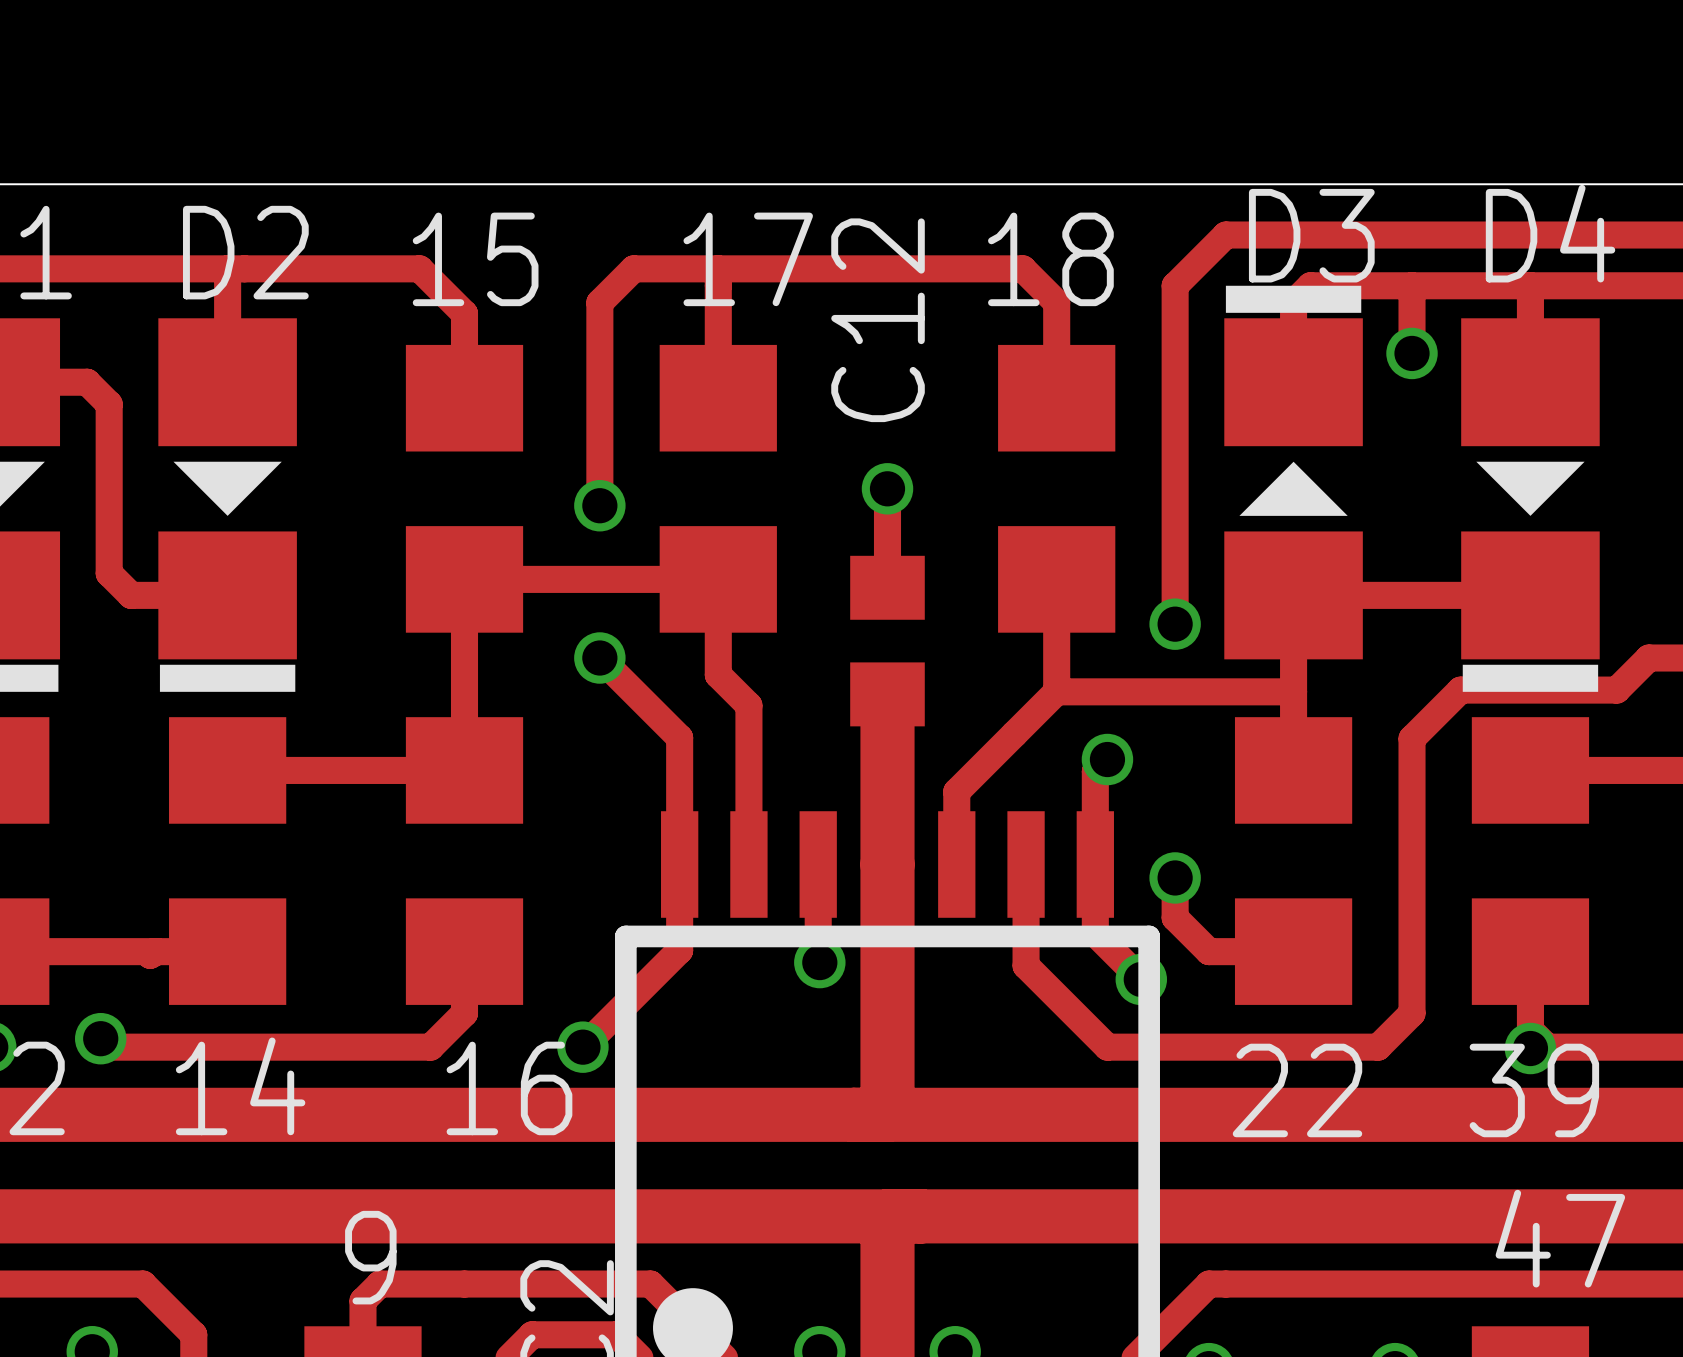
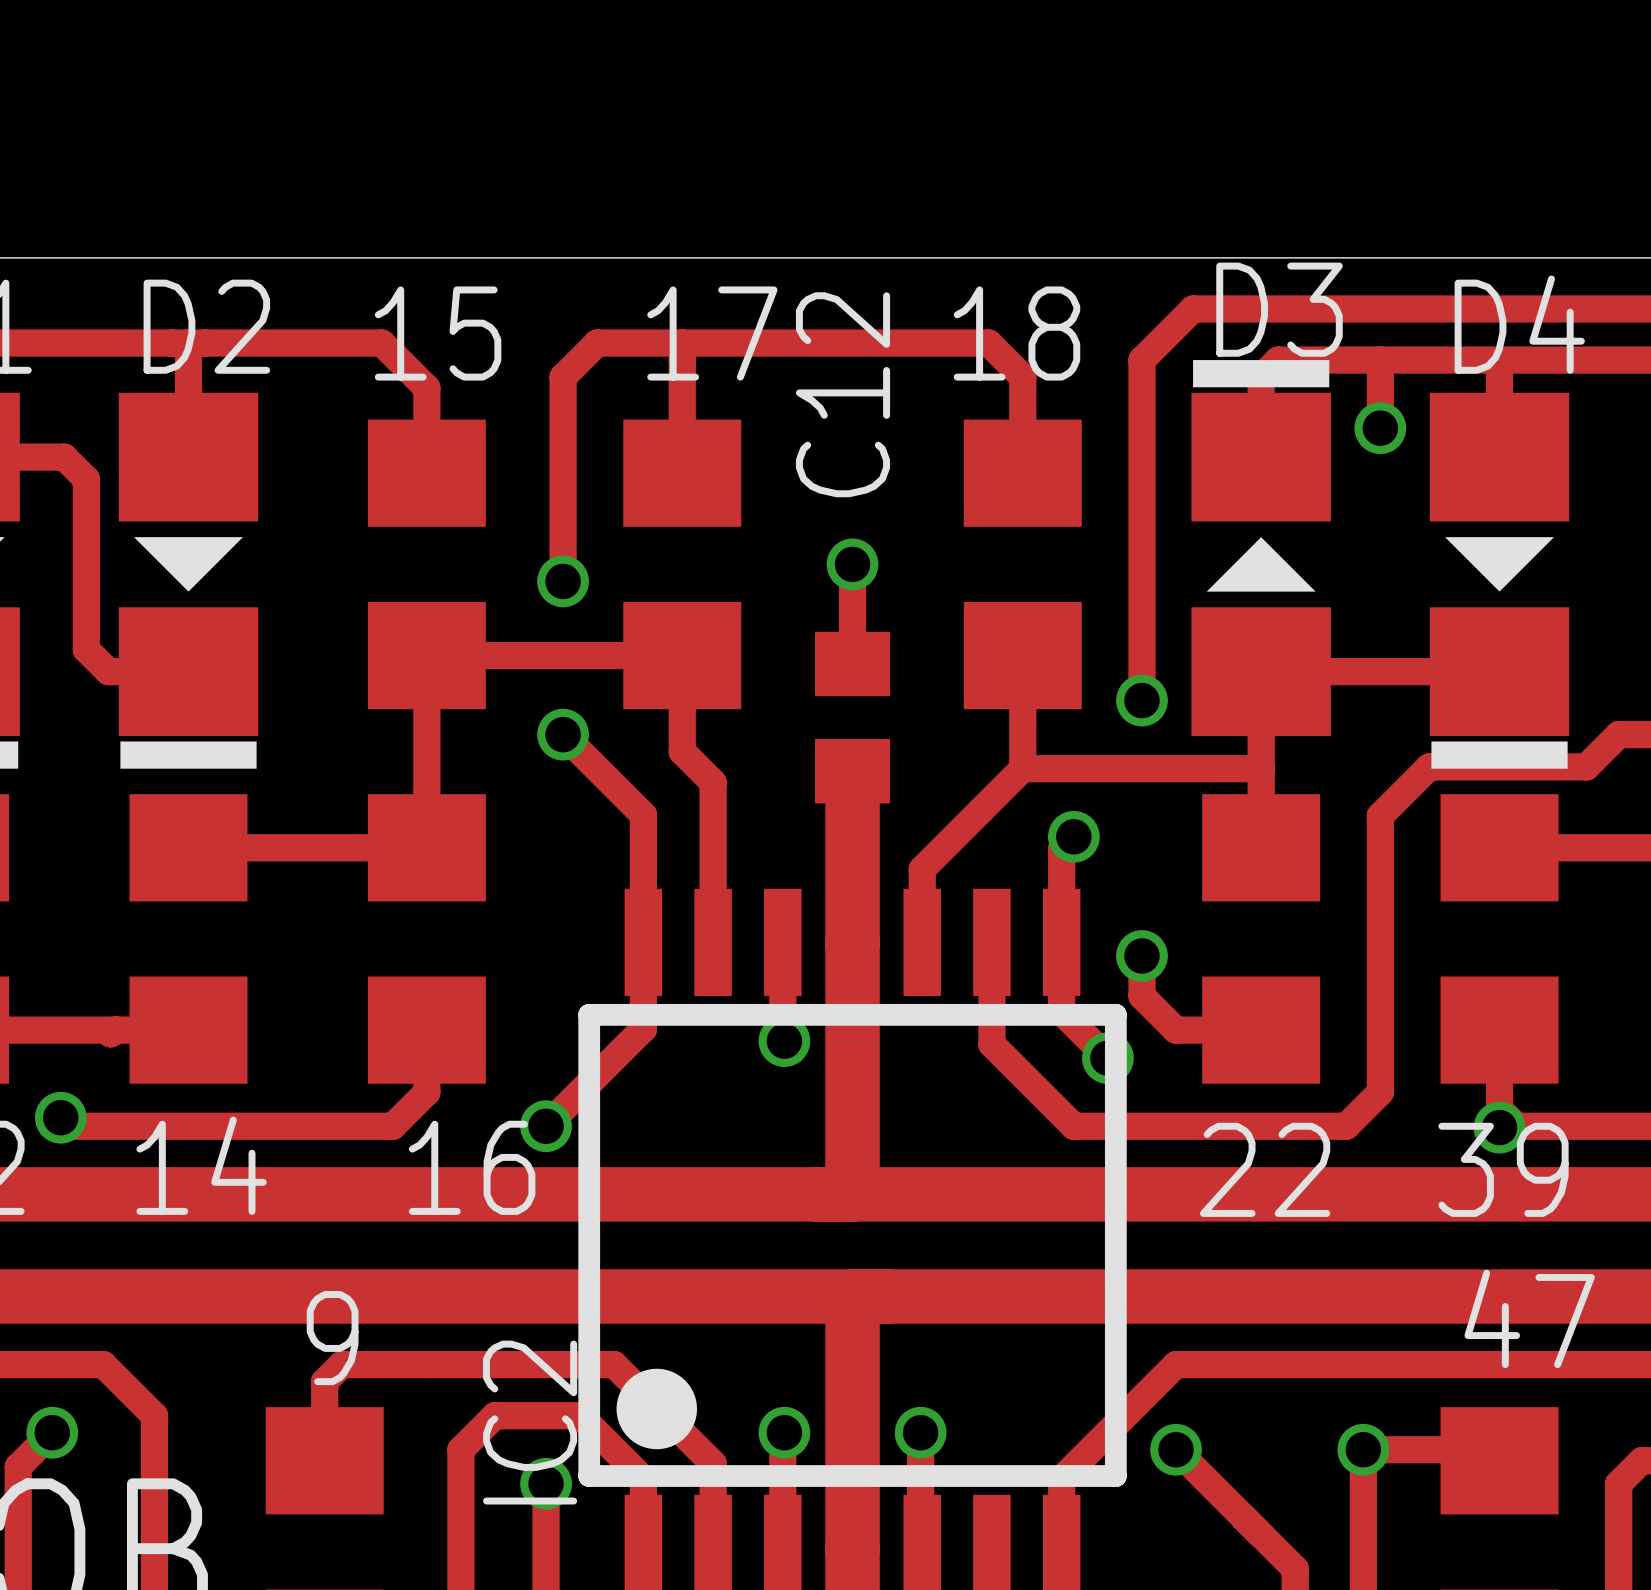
D4 name position: D4 (1550, 233) -> D4 (1519, 324)
track: (87, 382) (109, 404) (109, 573) (131, 595) (148, 595) -> (47, 457) (64, 457) (86, 479) (86, 649) (108, 671)

